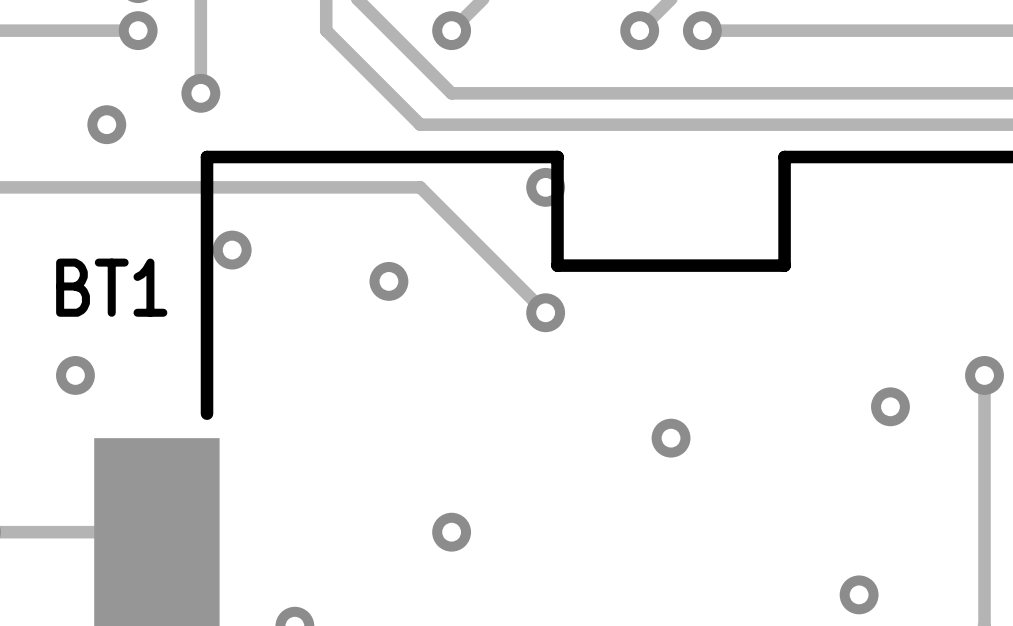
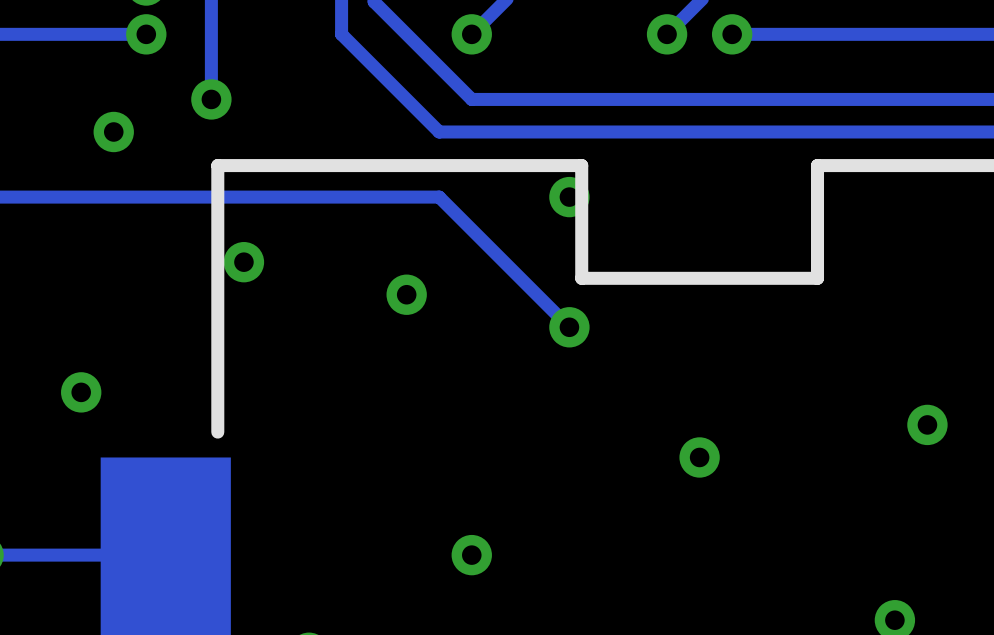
BT1 name: BT1 (111, 287) -> none

